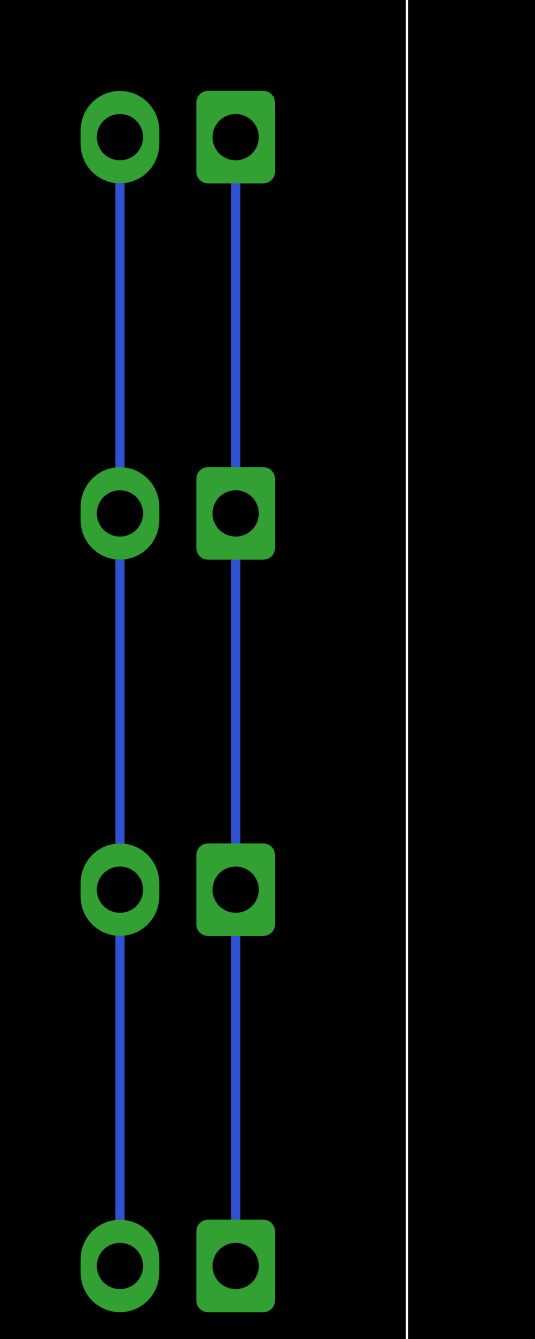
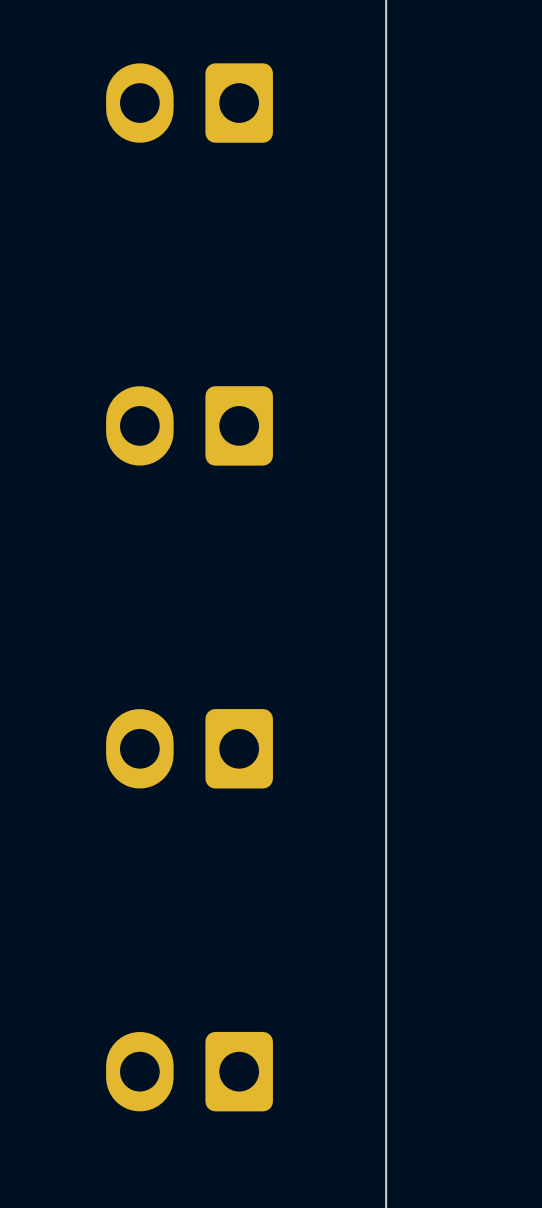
track: (119, 137) (119, 1265) -> none
track: (235, 137) (235, 1265) -> none

